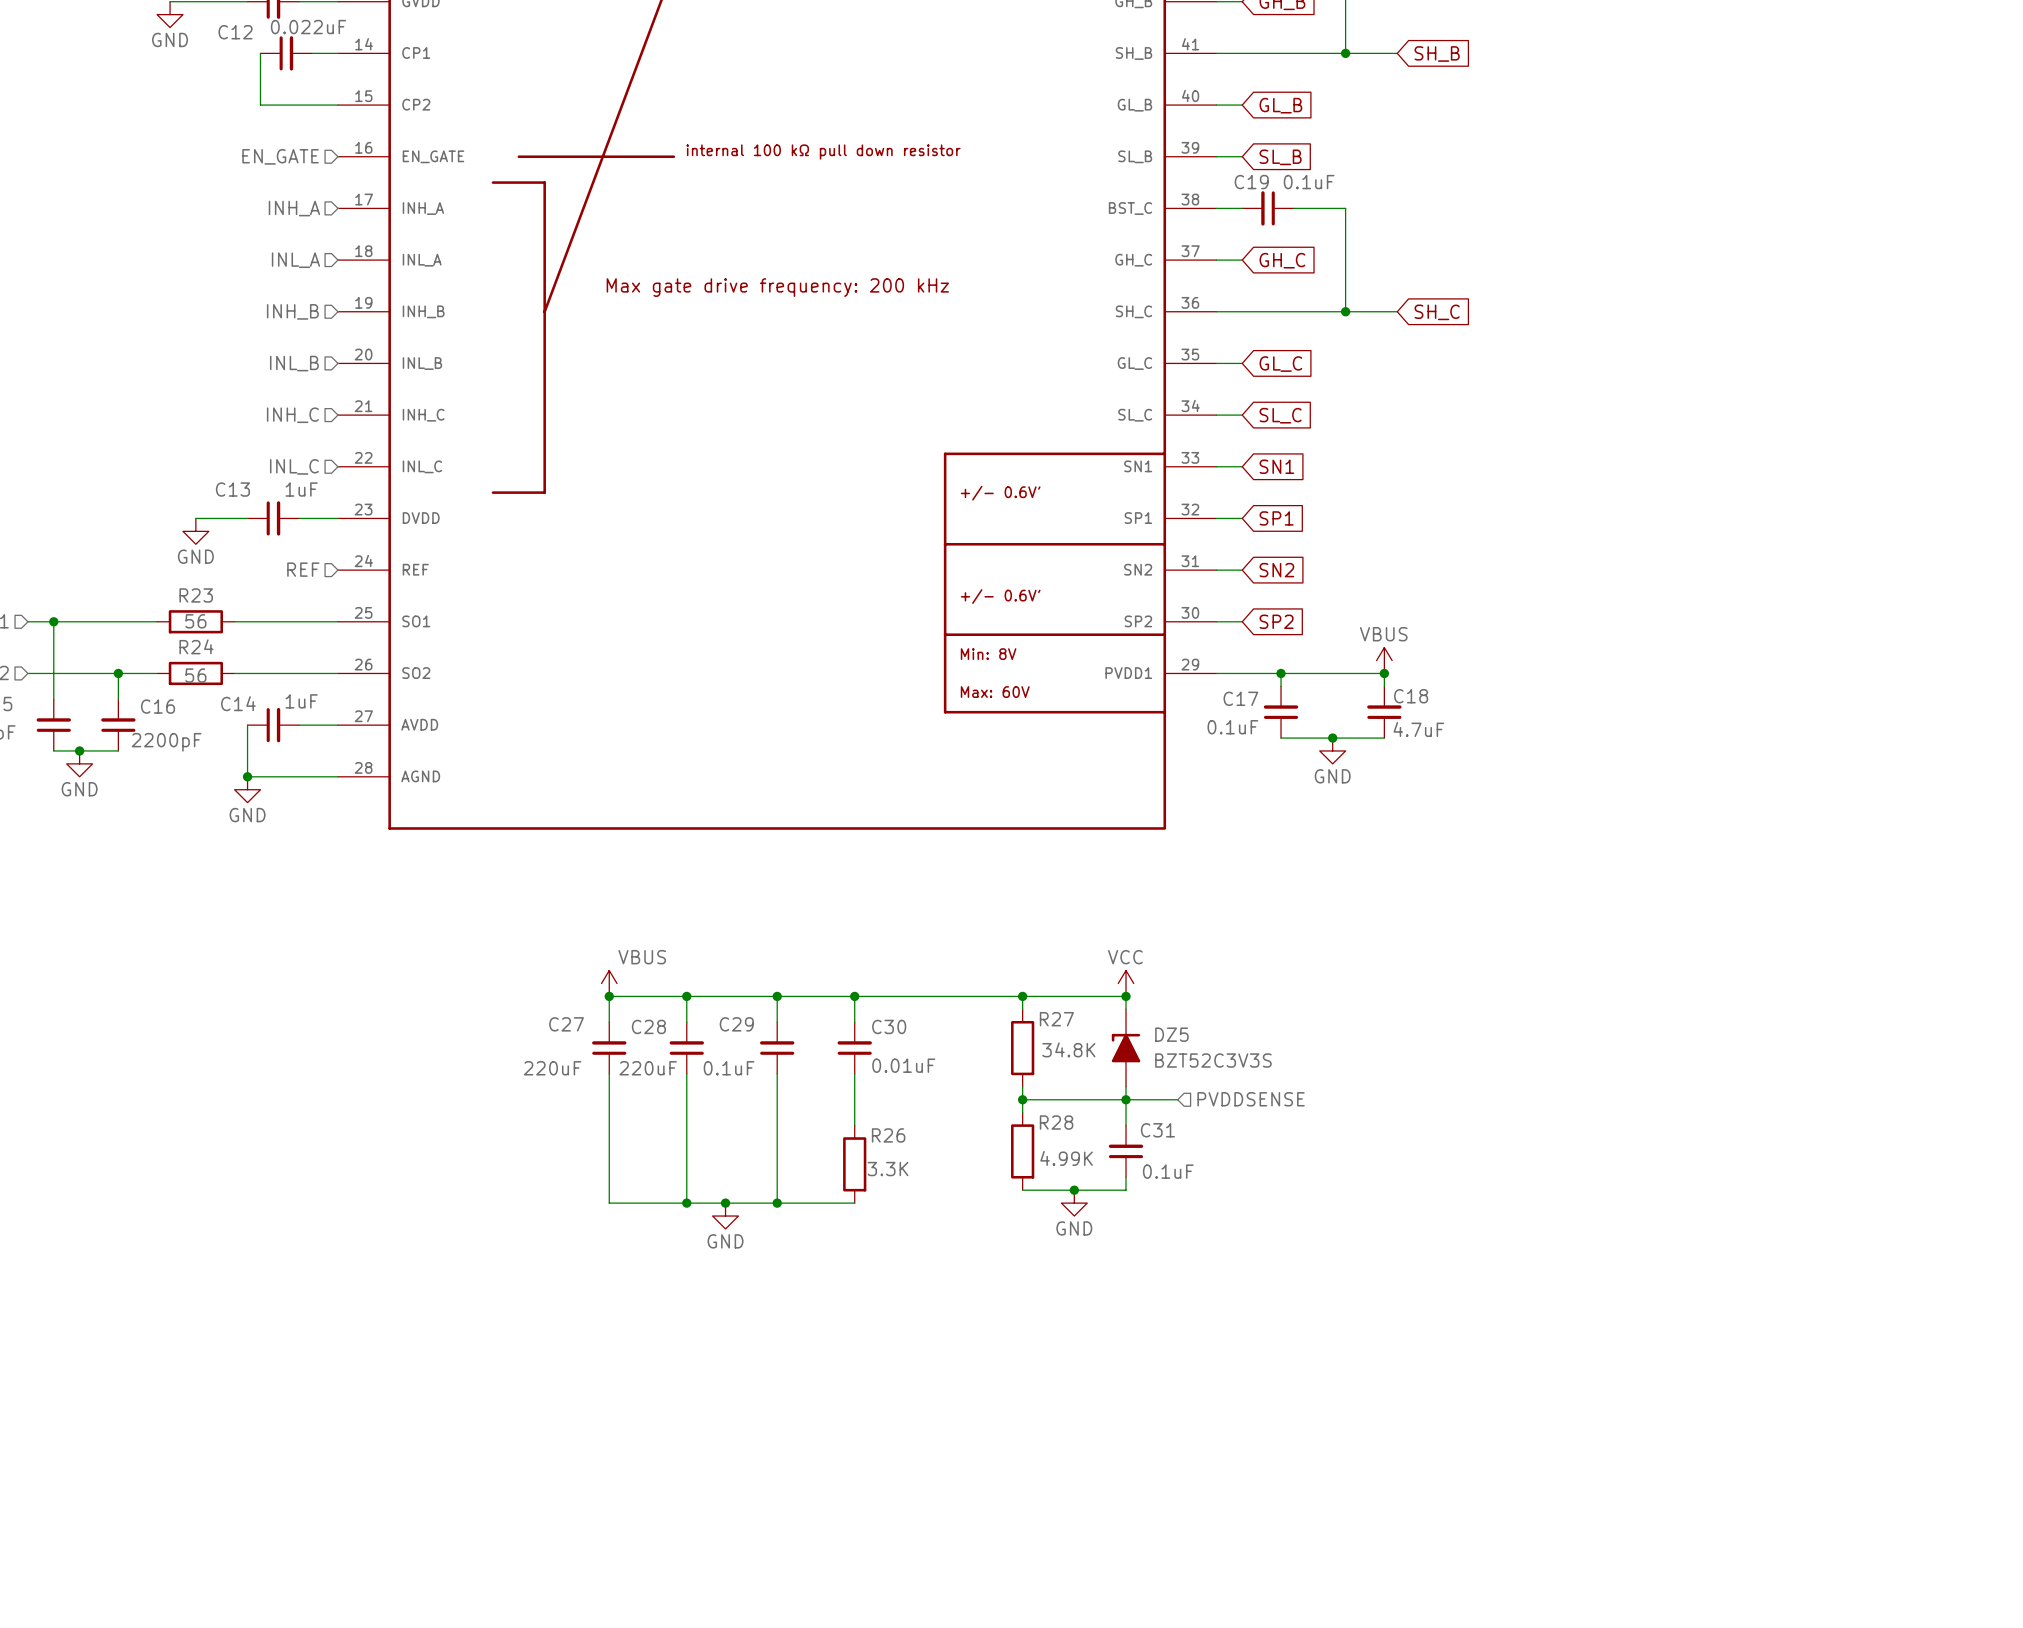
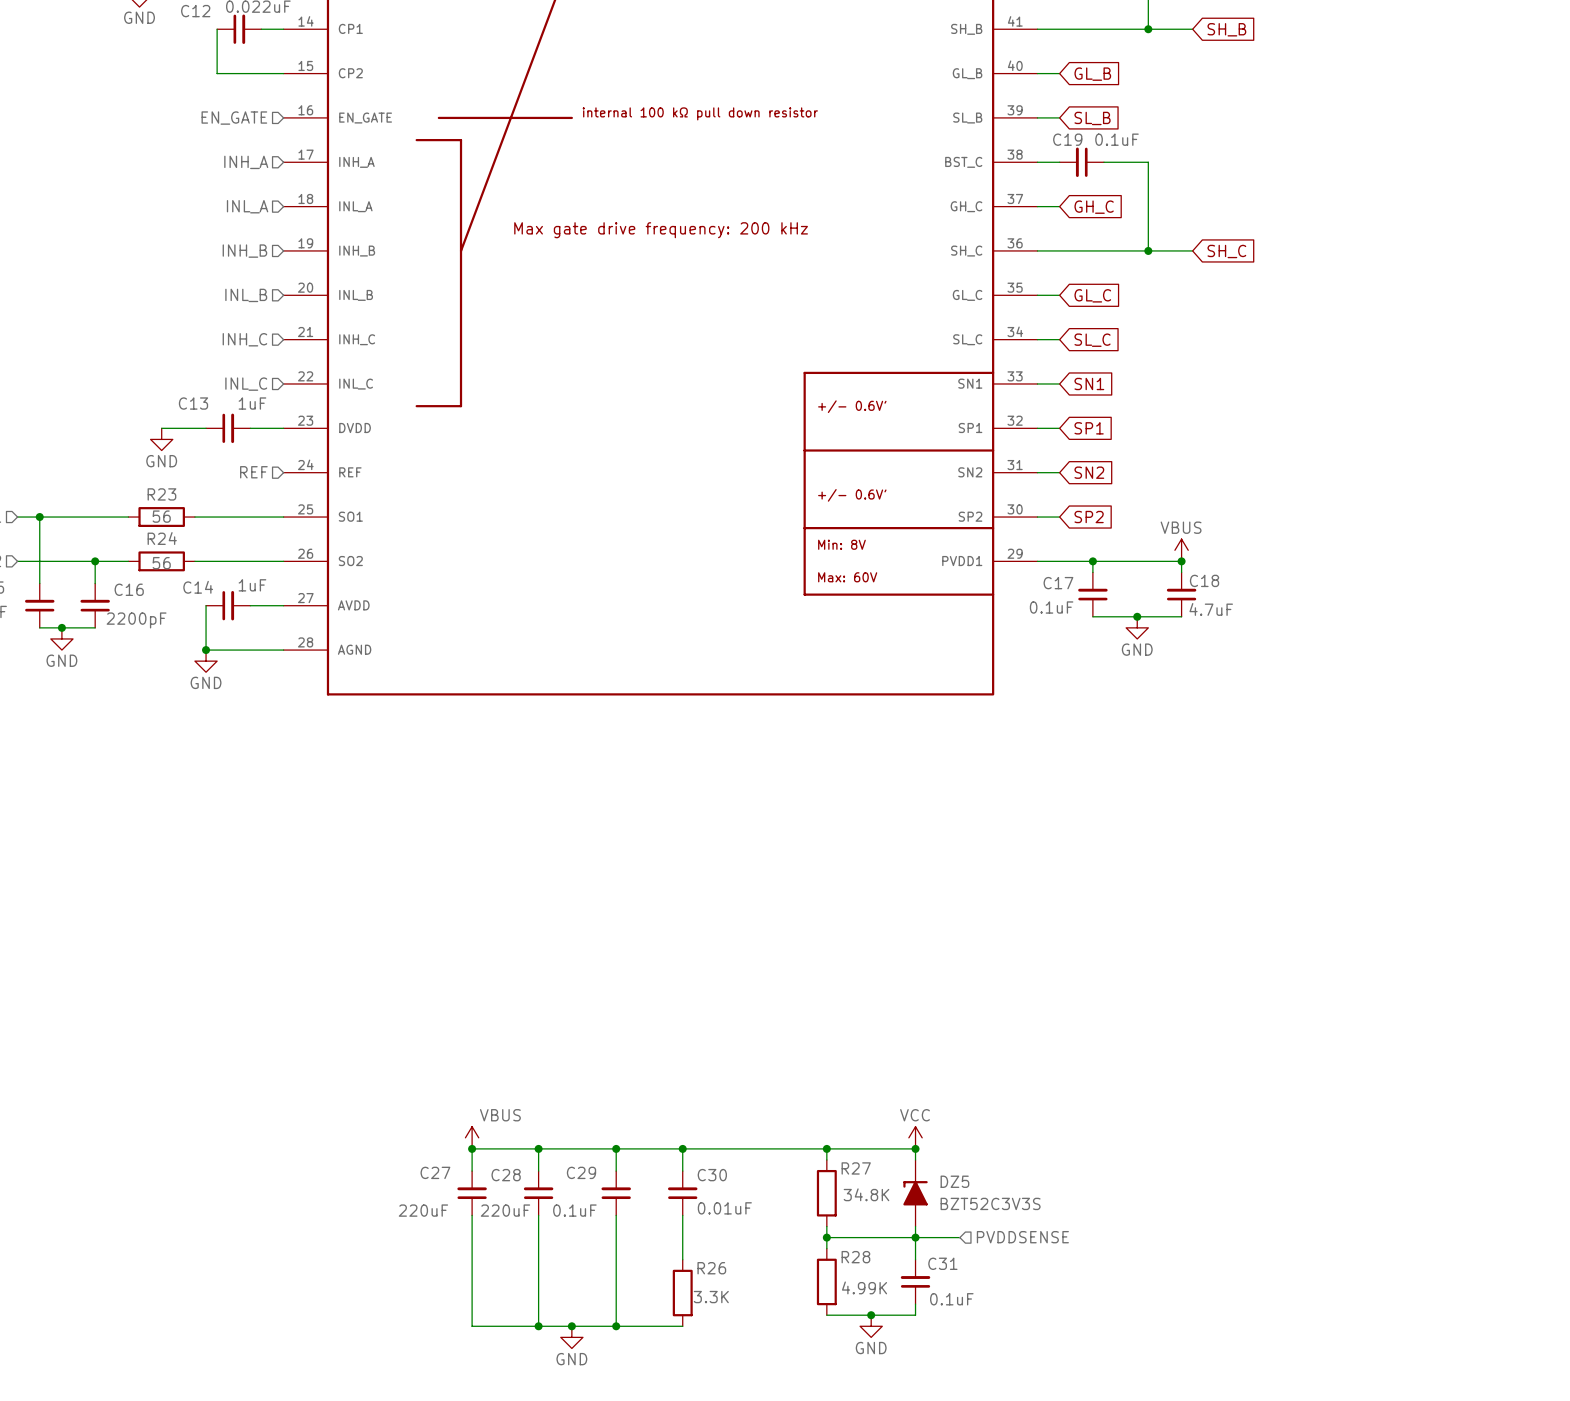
power symbol: VBUS (609, 983) -> none
power symbol: VCC (1126, 983) -> none
junction: (609, 996) -> none
wire: (686, 996) (686, 1022) -> none
junction: (686, 996) -> none
wire: (777, 996) (777, 1022) -> none
junction: (777, 996) -> none
wire: (854, 996) (854, 1022) -> none
junction: (854, 996) -> none
wire: (1022, 996) (1022, 1009) -> none
junction: (1022, 996) -> none
junction: (1126, 996) -> none
wire: (1126, 1009) (1126, 996) (609, 996) (609, 1022) -> none
C27 position: (609, 1048) -> (472, 1193)
C28 position: (686, 1048) -> (538, 1193)
C29 position: (777, 1048) -> (616, 1193)
C30 position: (854, 1048) -> (682, 1193)
R27 position: (1022, 1048) -> (826, 1193)
DZ5 position: (1126, 1048) -> (915, 1193)
wire: (609, 1073) (609, 1203) (854, 1203) -> none
wire: (686, 1073) (686, 1203) -> none
wire: (777, 1073) (777, 1203) -> none
wire: (854, 1073) (854, 1125) -> none
wire: (1022, 1086) (1022, 1112) -> none
wire: (1126, 1086) (1126, 1125) -> none
wire: (1022, 1099) (1177, 1099) -> none
junction: (1022, 1099) -> none
junction: (1126, 1099) -> none
hierarchical label: PVDDSENSE (1251, 1099) -> none
R28 position: (1022, 1151) -> (826, 1281)
C31 position: (1126, 1151) -> (915, 1281)
R26 position: (854, 1164) -> (682, 1293)
wire: (1126, 1177) (1126, 1190) (1022, 1190) -> none
junction: (1074, 1190) -> none
junction: (686, 1203) -> none
junction: (725, 1203) -> none
junction: (777, 1203) -> none
power symbol: GND (1074, 1203) -> none
power symbol: GND (725, 1216) -> none
power symbol: none -> VBUS (472, 1137)
power symbol: none -> VCC (915, 1137)
junction: none -> (472, 1148)
wire: none -> (538, 1148) (538, 1171)
junction: none -> (538, 1148)
wire: none -> (616, 1148) (616, 1171)
junction: none -> (616, 1148)
wire: none -> (682, 1148) (682, 1171)
junction: none -> (682, 1148)
wire: none -> (826, 1148) (826, 1160)
junction: none -> (826, 1148)
junction: none -> (915, 1148)
wire: none -> (915, 1160) (915, 1148) (472, 1148) (472, 1171)
wire: none -> (472, 1215) (472, 1326) (682, 1326)
wire: none -> (538, 1215) (538, 1326)
wire: none -> (616, 1215) (616, 1326)
wire: none -> (682, 1215) (682, 1259)
wire: none -> (826, 1226) (826, 1248)
wire: none -> (915, 1226) (915, 1259)
hierarchical label: none -> PVDDSENSE (1022, 1237)
wire: none -> (826, 1237) (959, 1237)
junction: none -> (826, 1237)
junction: none -> (915, 1237)
wire: none -> (915, 1304) (915, 1315) (826, 1315)
junction: none -> (871, 1315)
junction: none -> (538, 1326)
junction: none -> (571, 1326)
junction: none -> (616, 1326)
power symbol: none -> GND (871, 1326)
power symbol: none -> GND (571, 1337)

